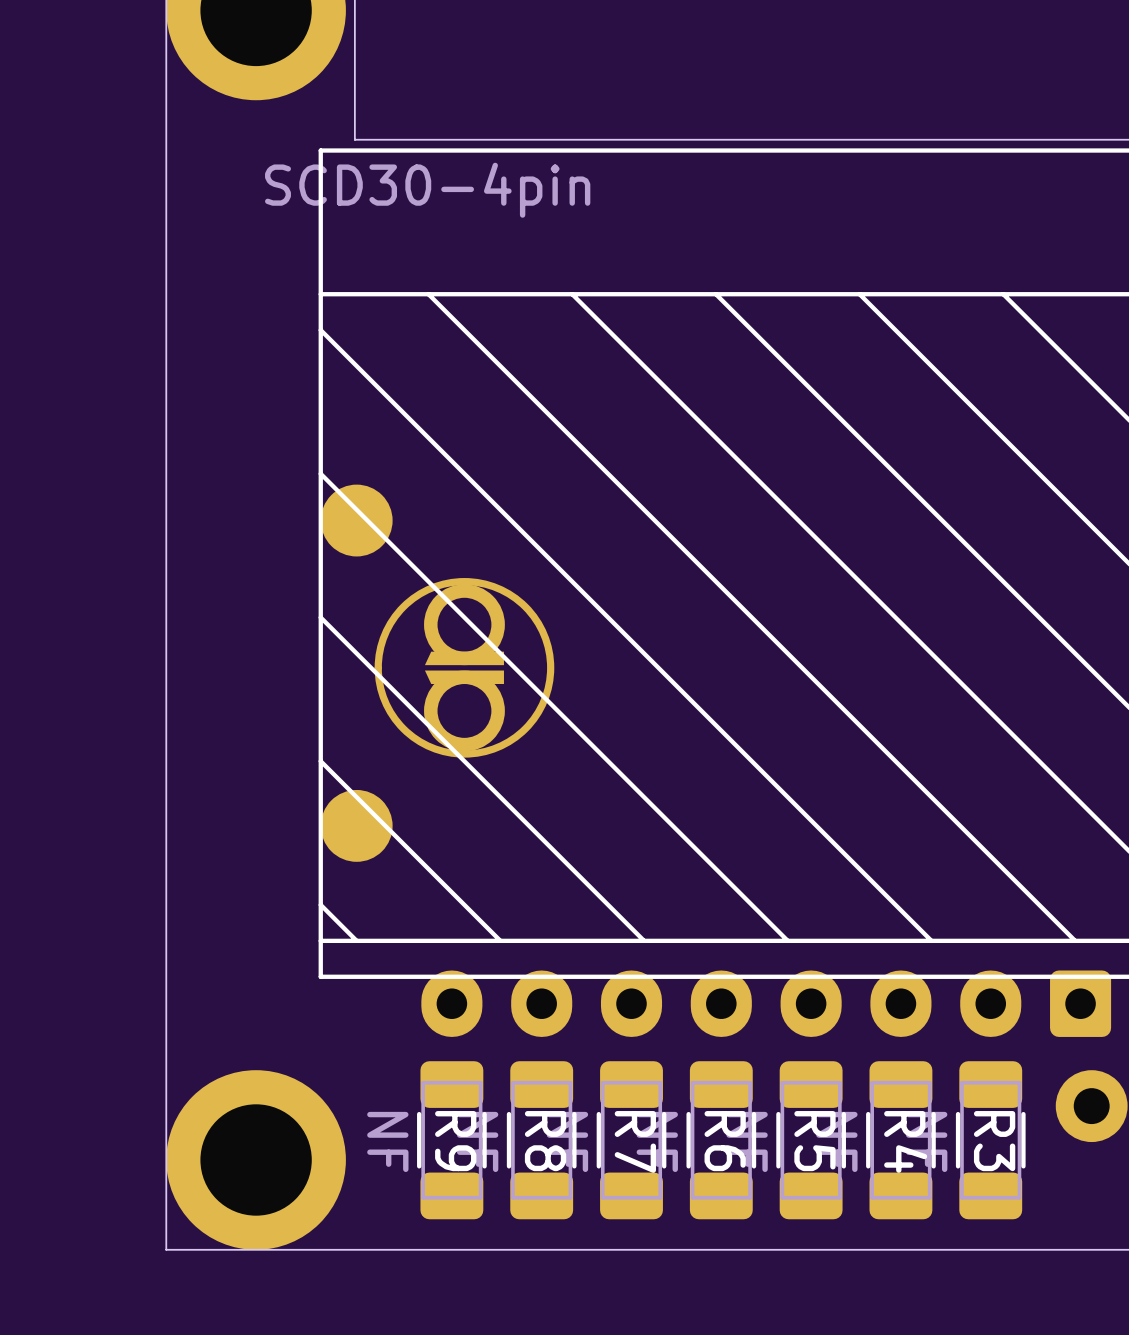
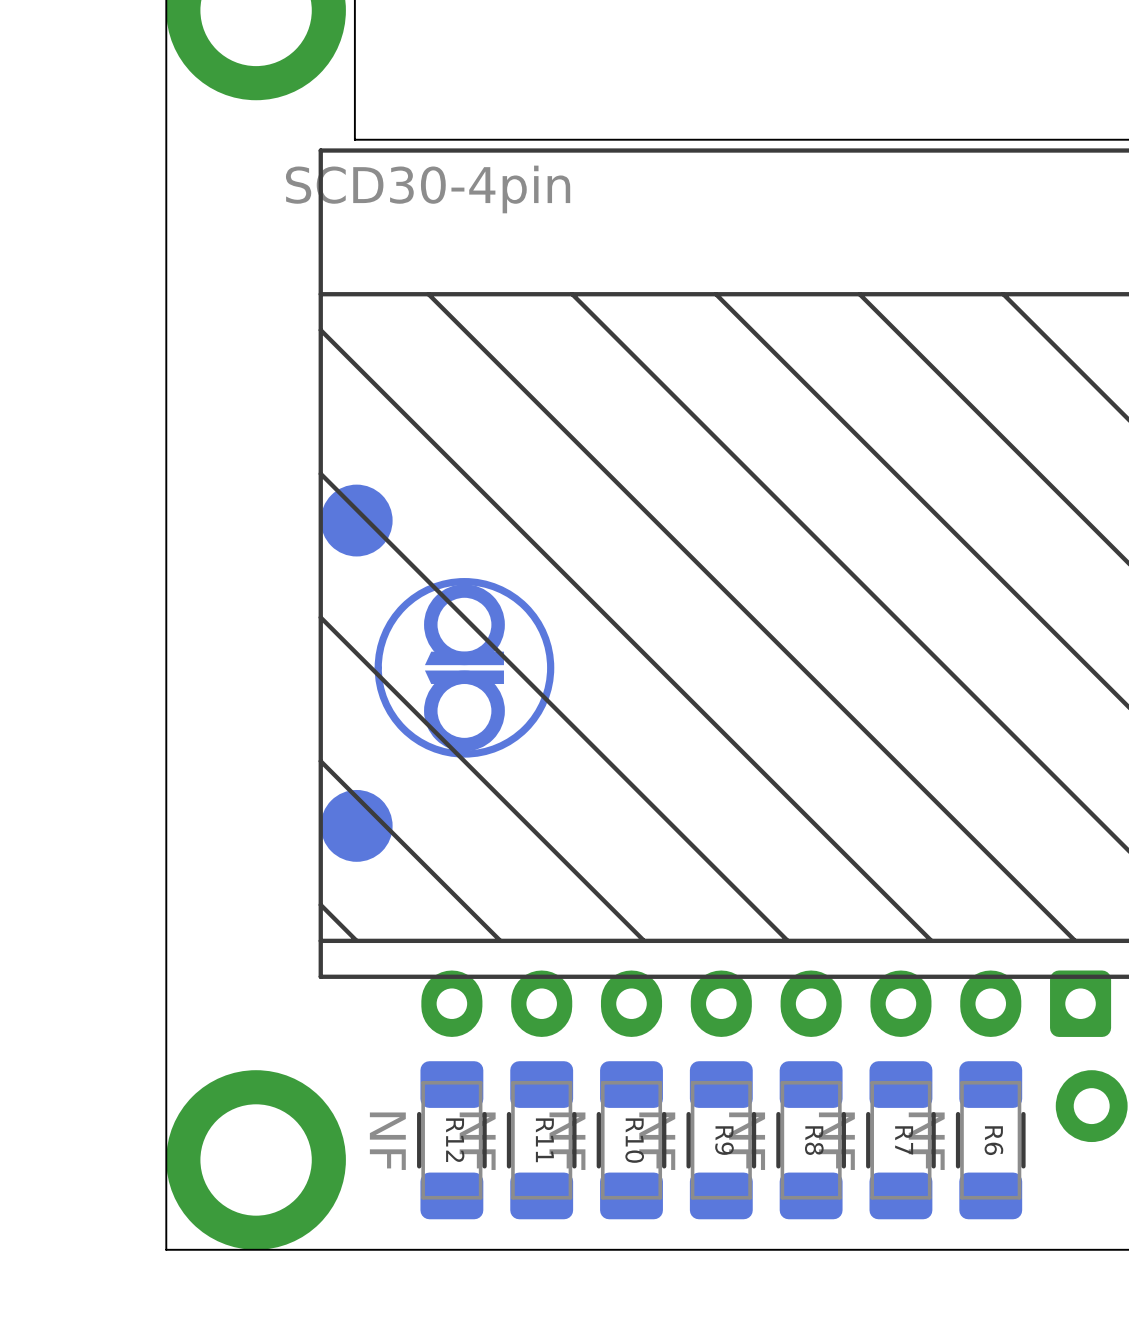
R9 name: R9 (455, 1141) -> R12 (455, 1140)
R8 name: R8 (545, 1141) -> R11 (544, 1140)
R7 name: R7 (635, 1141) -> R10 (634, 1140)
R6 name: R6 (725, 1141) -> R9 (724, 1140)
R5 name: R5 (814, 1141) -> R8 (814, 1140)
R4 name: R4 (905, 1141) -> R7 (904, 1140)
R3 name: R3 (994, 1141) -> R6 (993, 1140)

